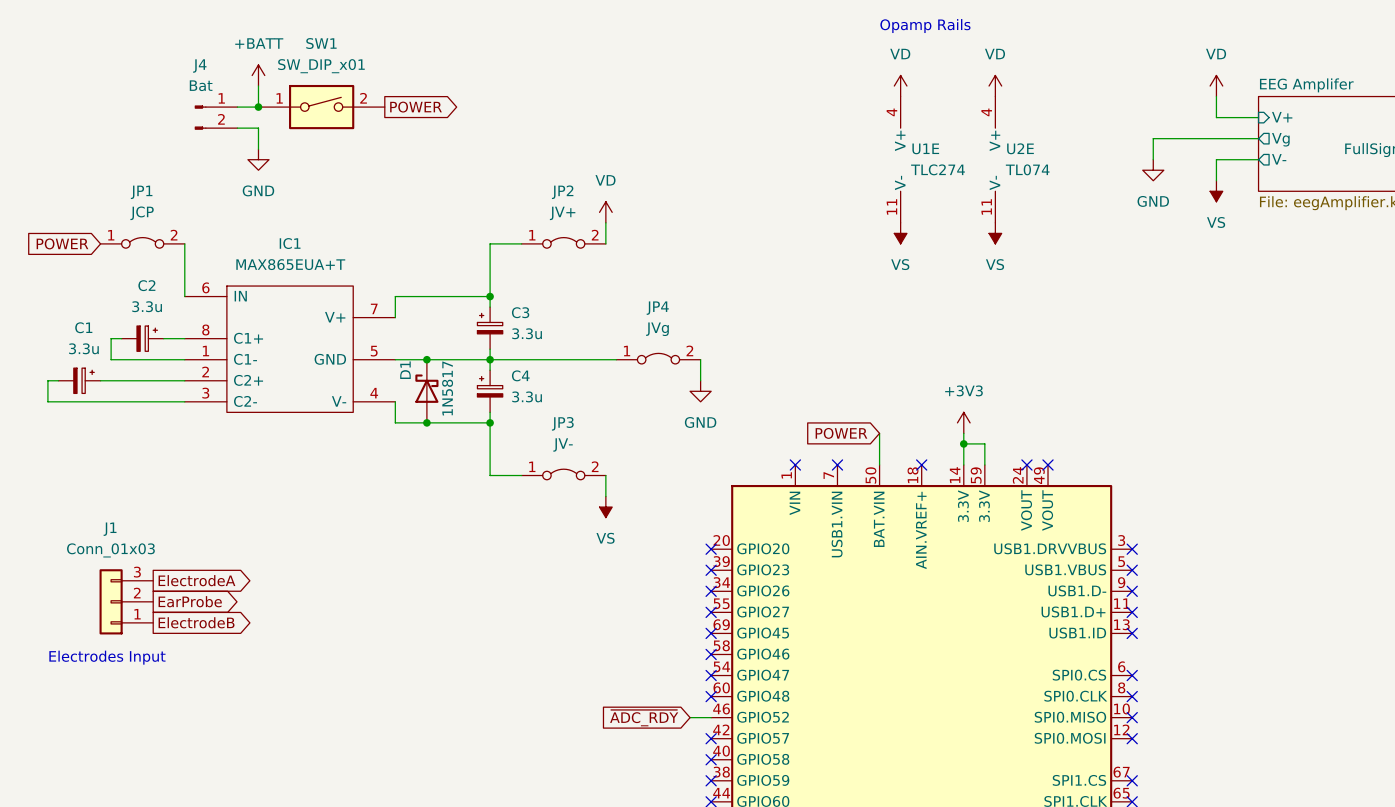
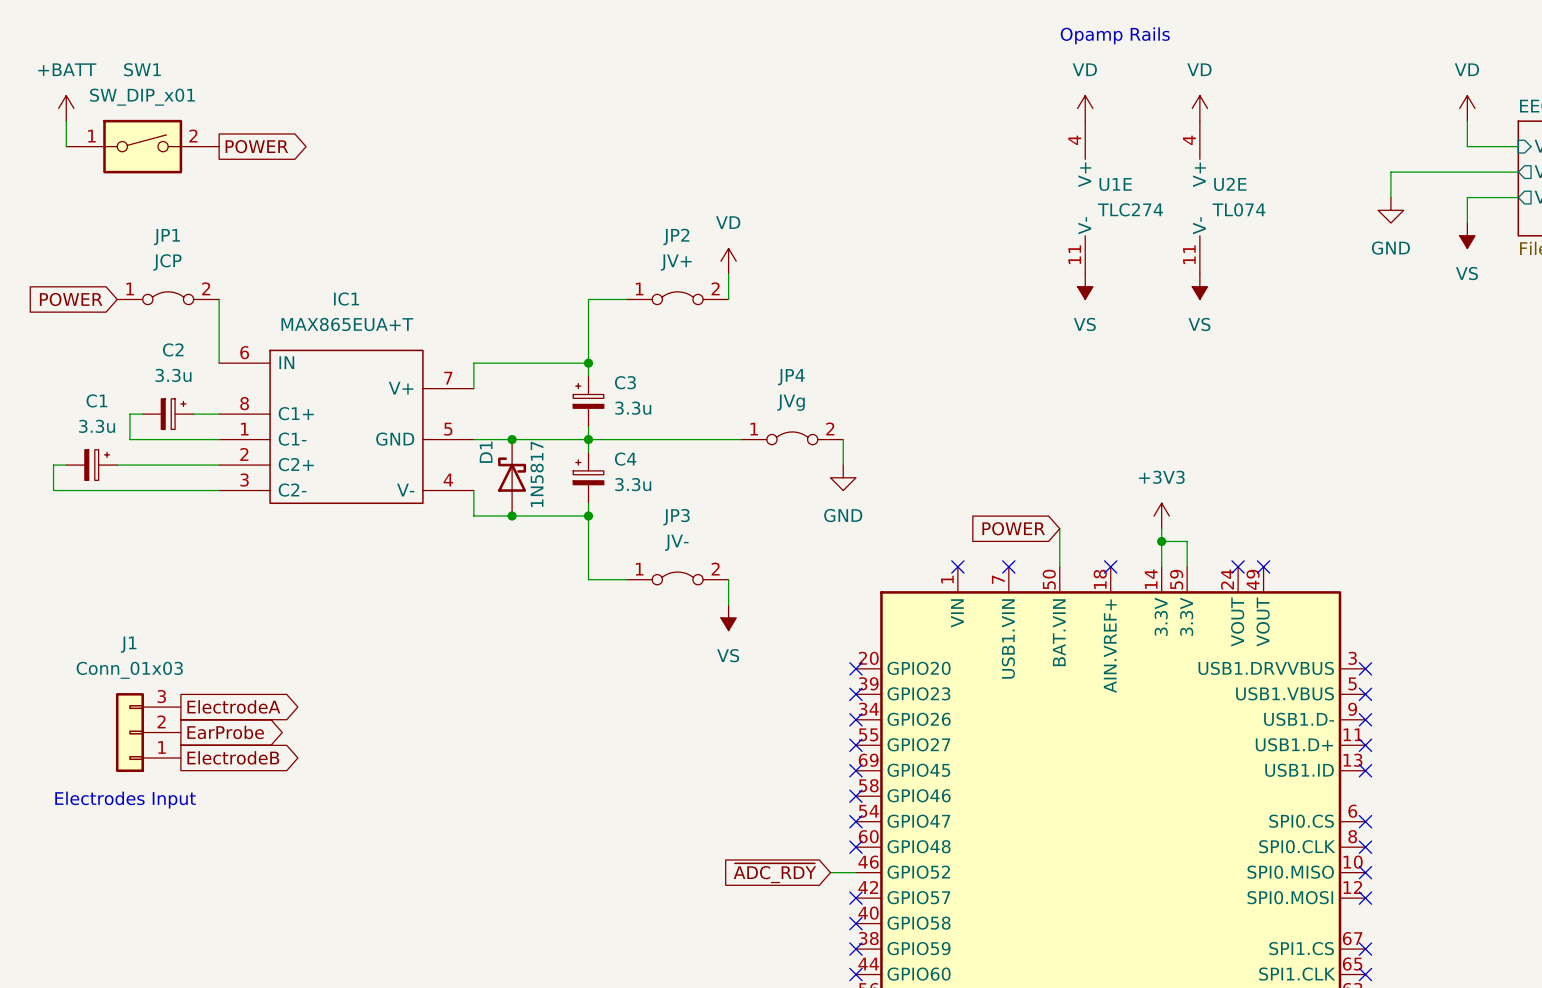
power symbol position: +BATT (258, 75) -> +BATT (66, 108)
wire: (258, 86) (258, 107) (237, 107) -> none
wire: none -> (66, 121) (66, 146)
junction: (258, 107) -> none
SW1 position: (321, 107) -> (142, 146)
global label position: POWER (416, 107) -> POWER (256, 146)
J4: Bat (216, 117) -> none
wire: (237, 128) (258, 128) (258, 149) -> none
power symbol: GND (258, 159) -> none

